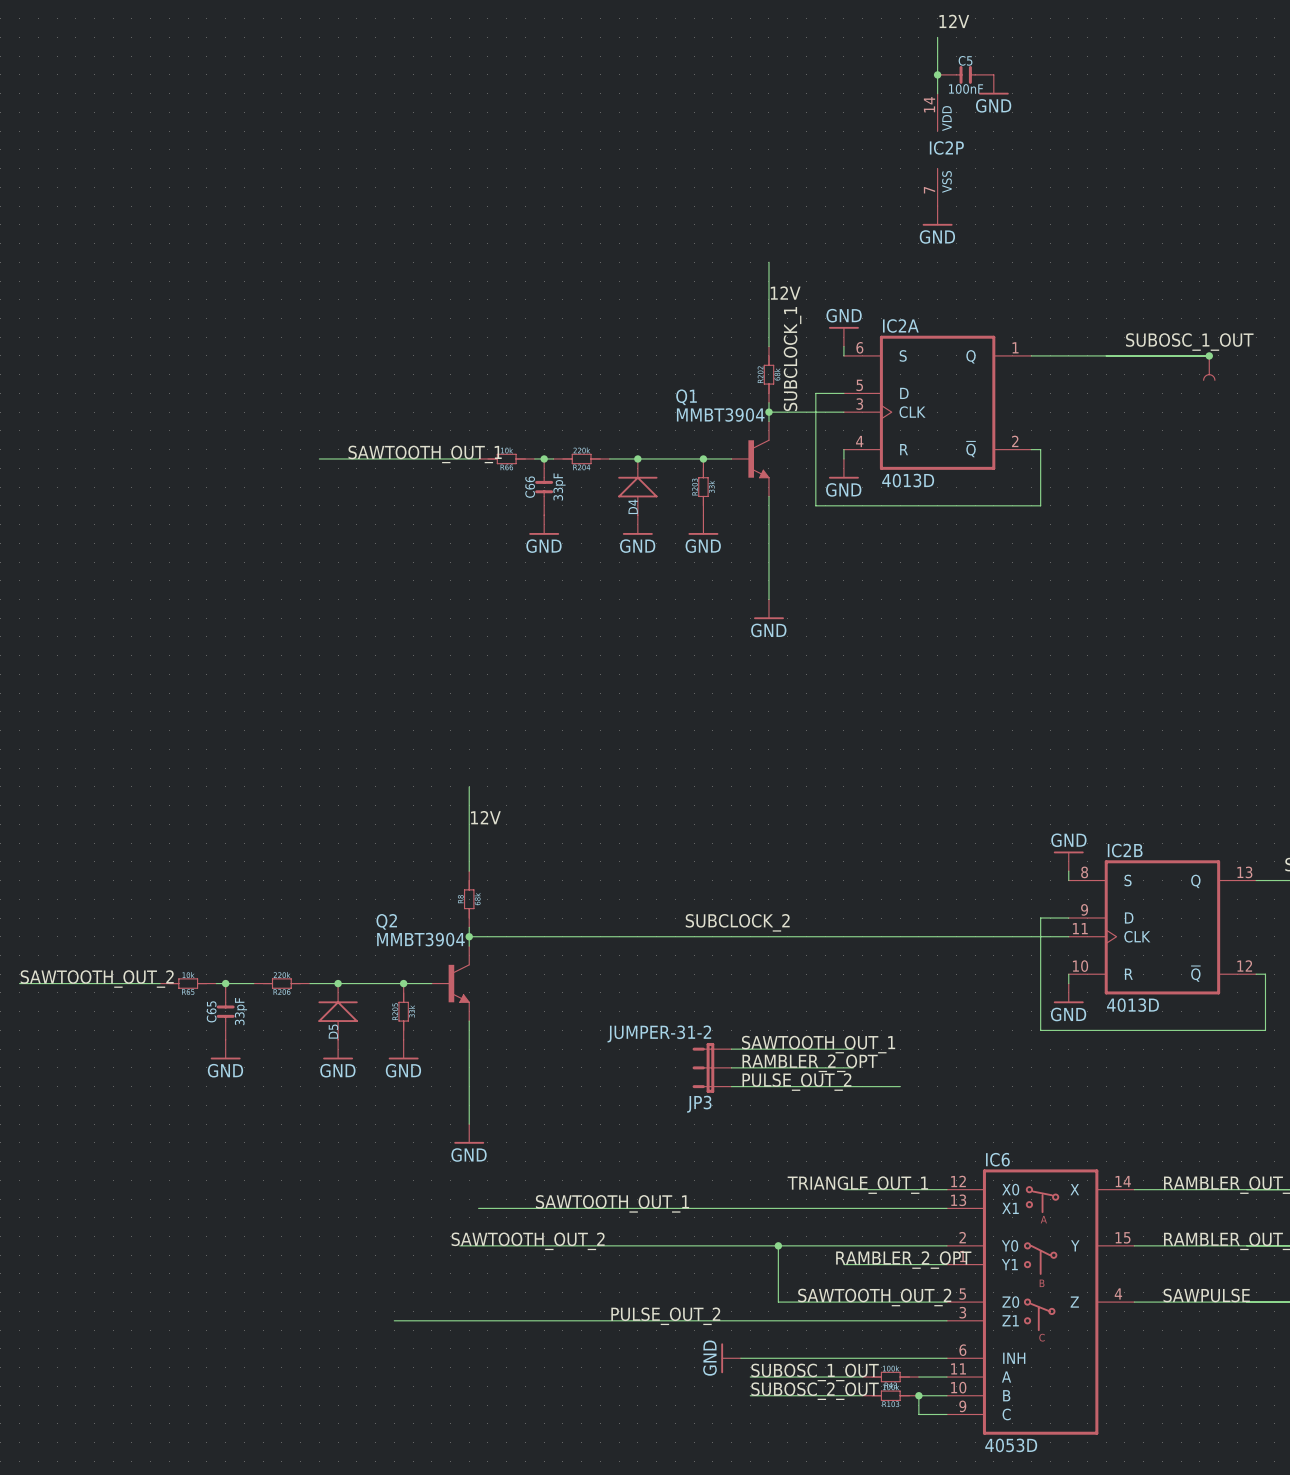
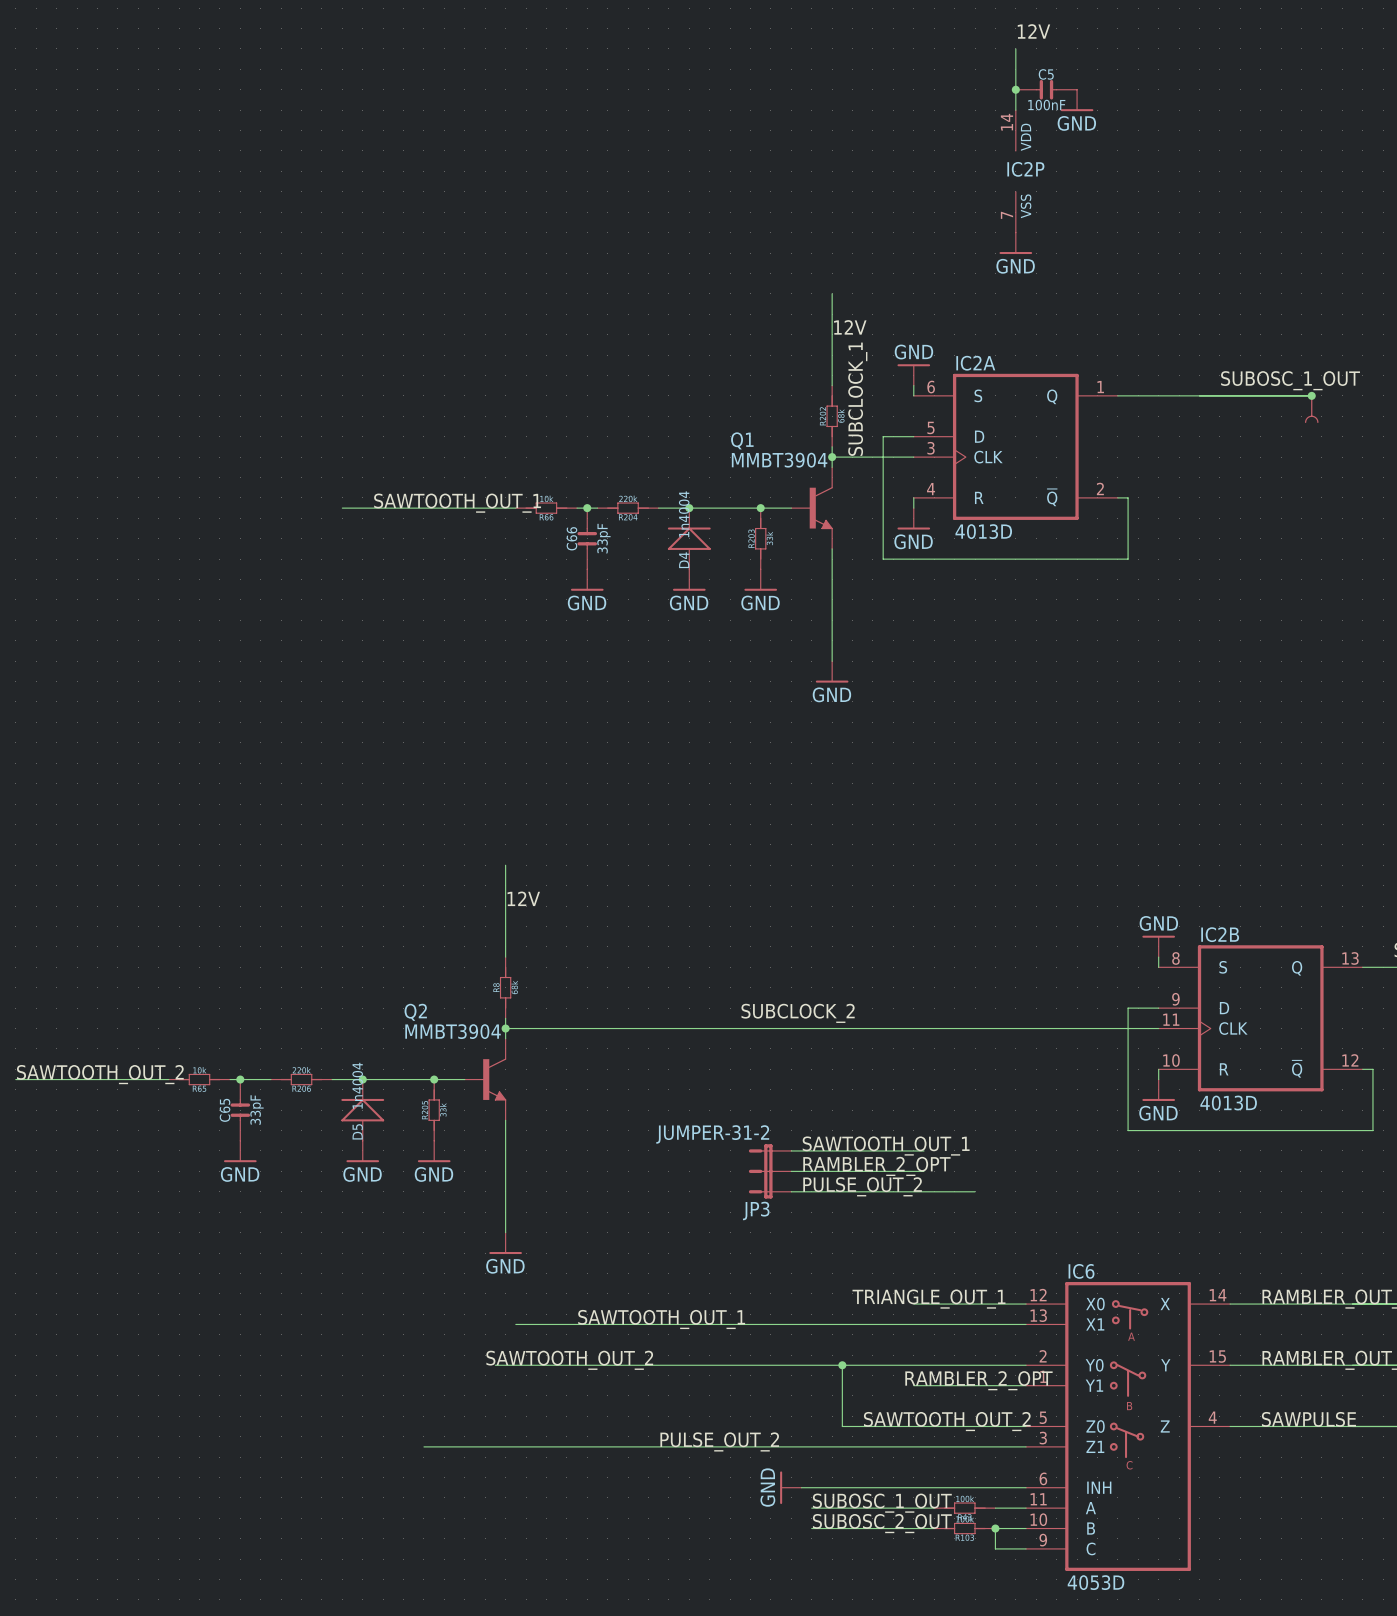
D4 value: none -> 1n4004 (684, 514)
D5 value: none -> 1n4004 (357, 1085)

